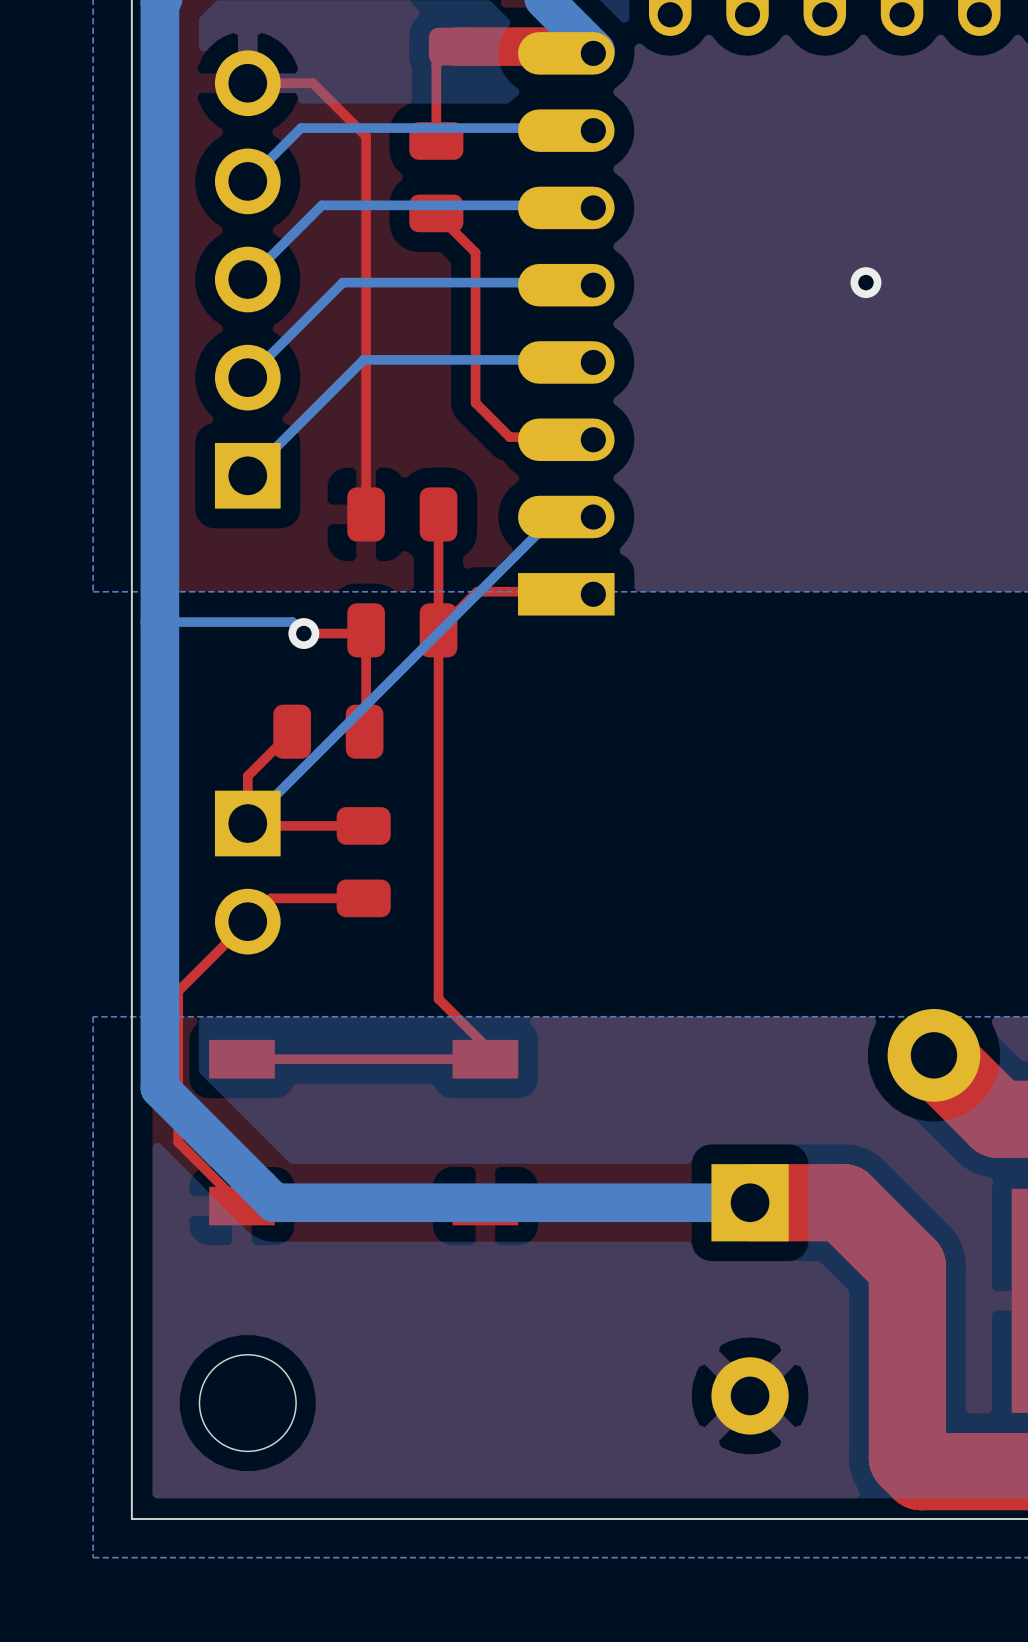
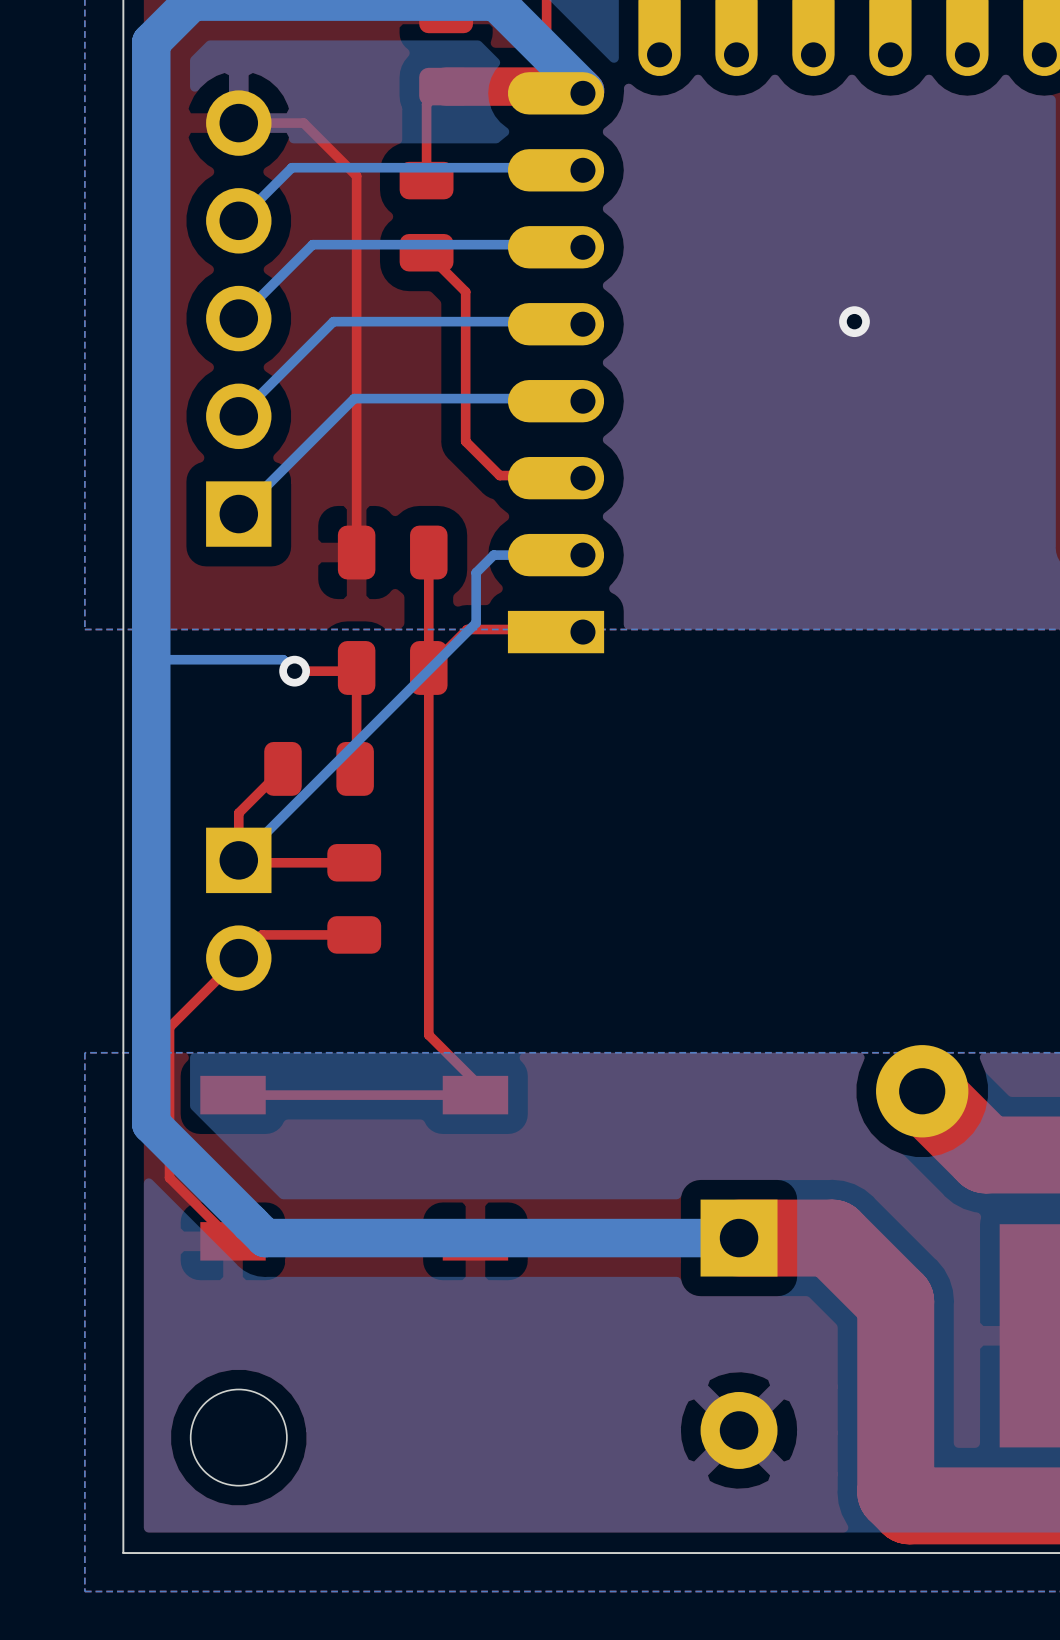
bottom track: (595, 514) (556, 514) (486, 585) -> (582, 555) (493, 555) (476, 572) (476, 623)

